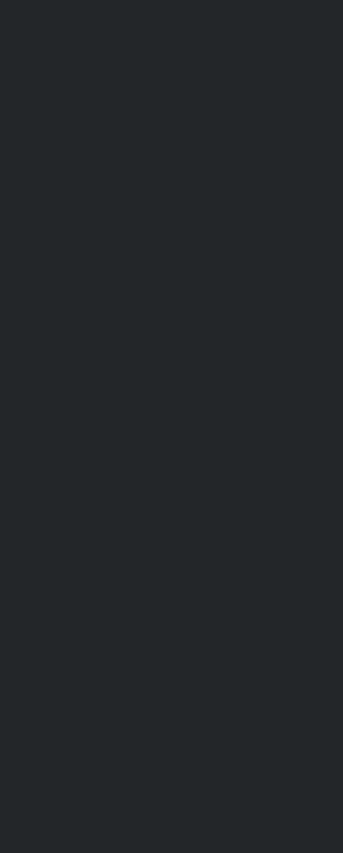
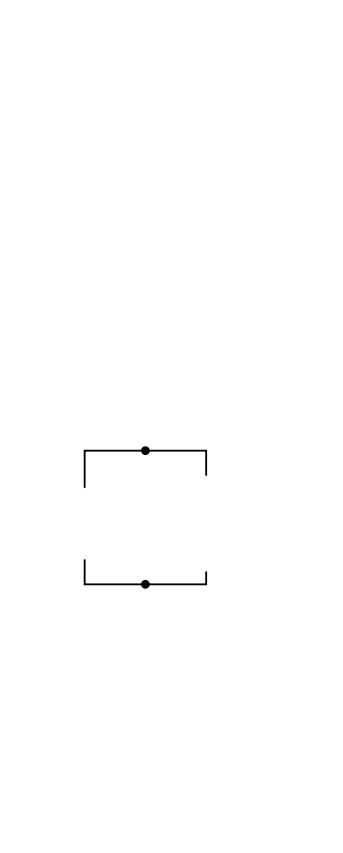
junction: none -> (145, 450)
wire: none -> (206, 474) (206, 450) (84, 450) (84, 487)
wire: none -> (84, 560) (84, 584) (206, 584) (206, 572)
junction: none -> (145, 584)

